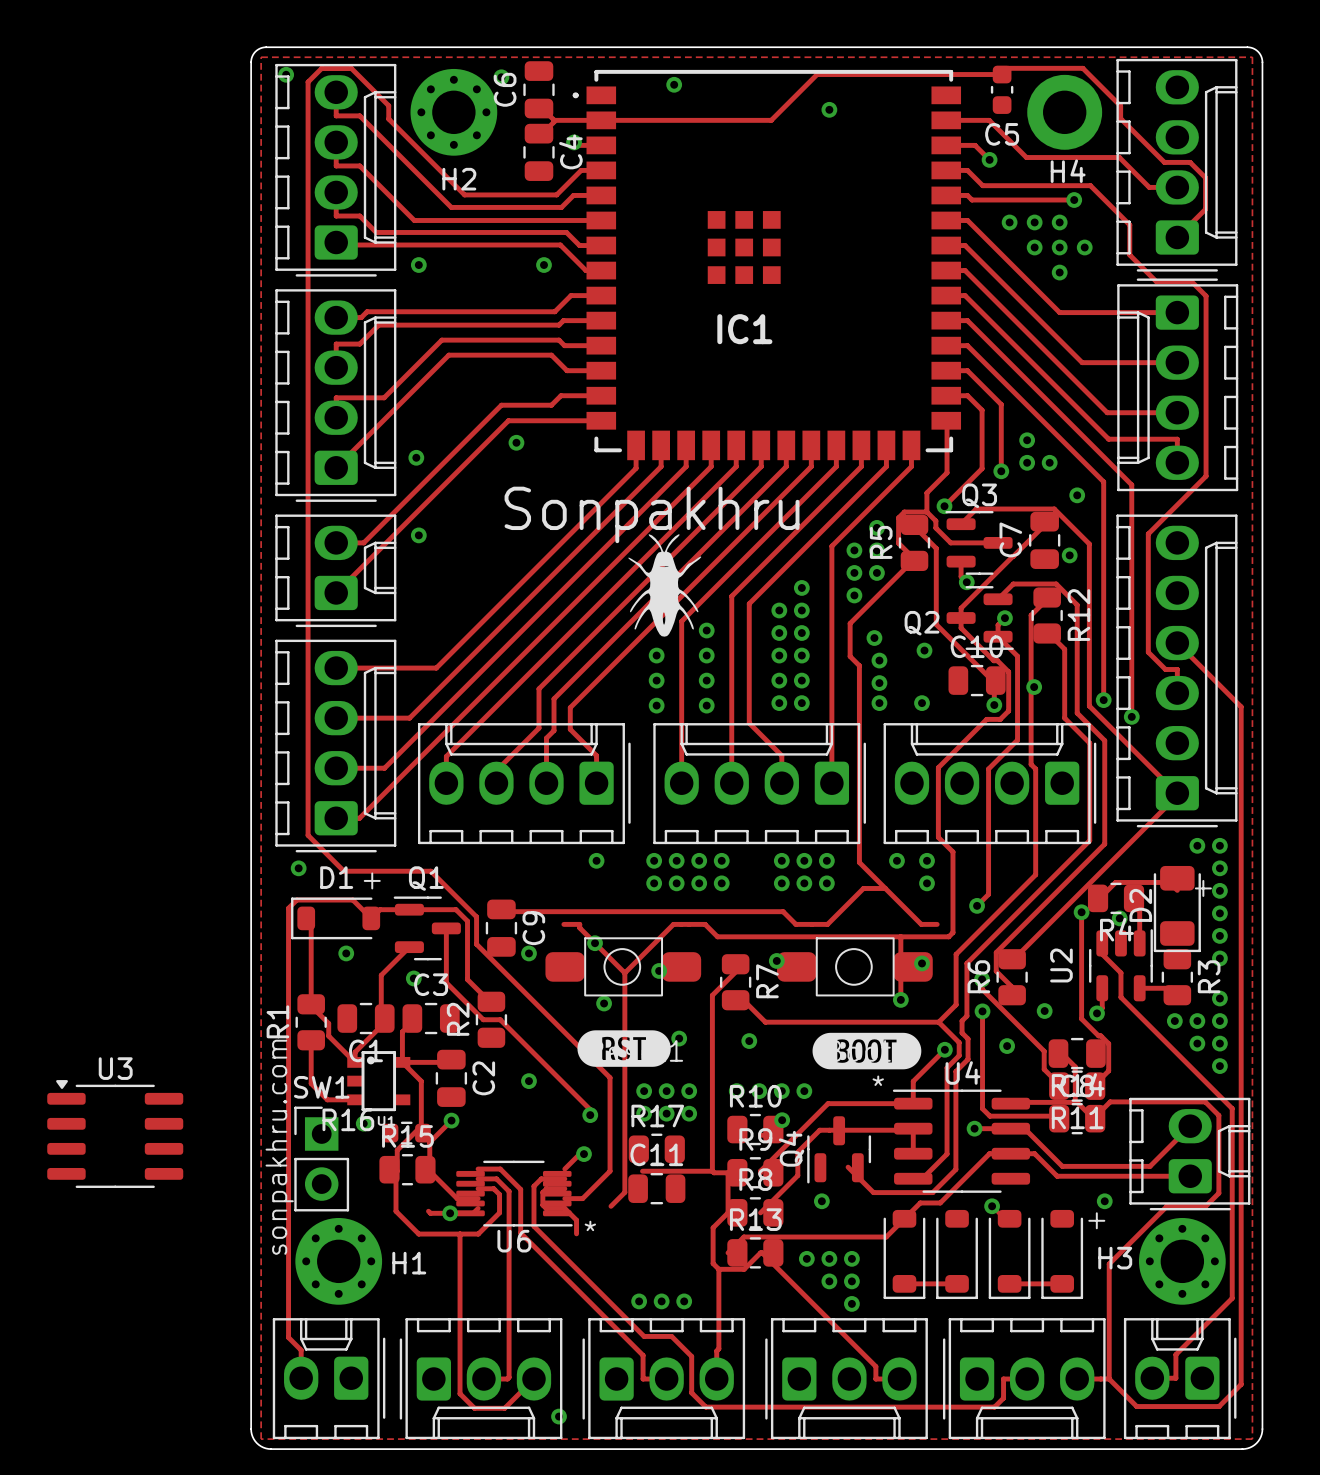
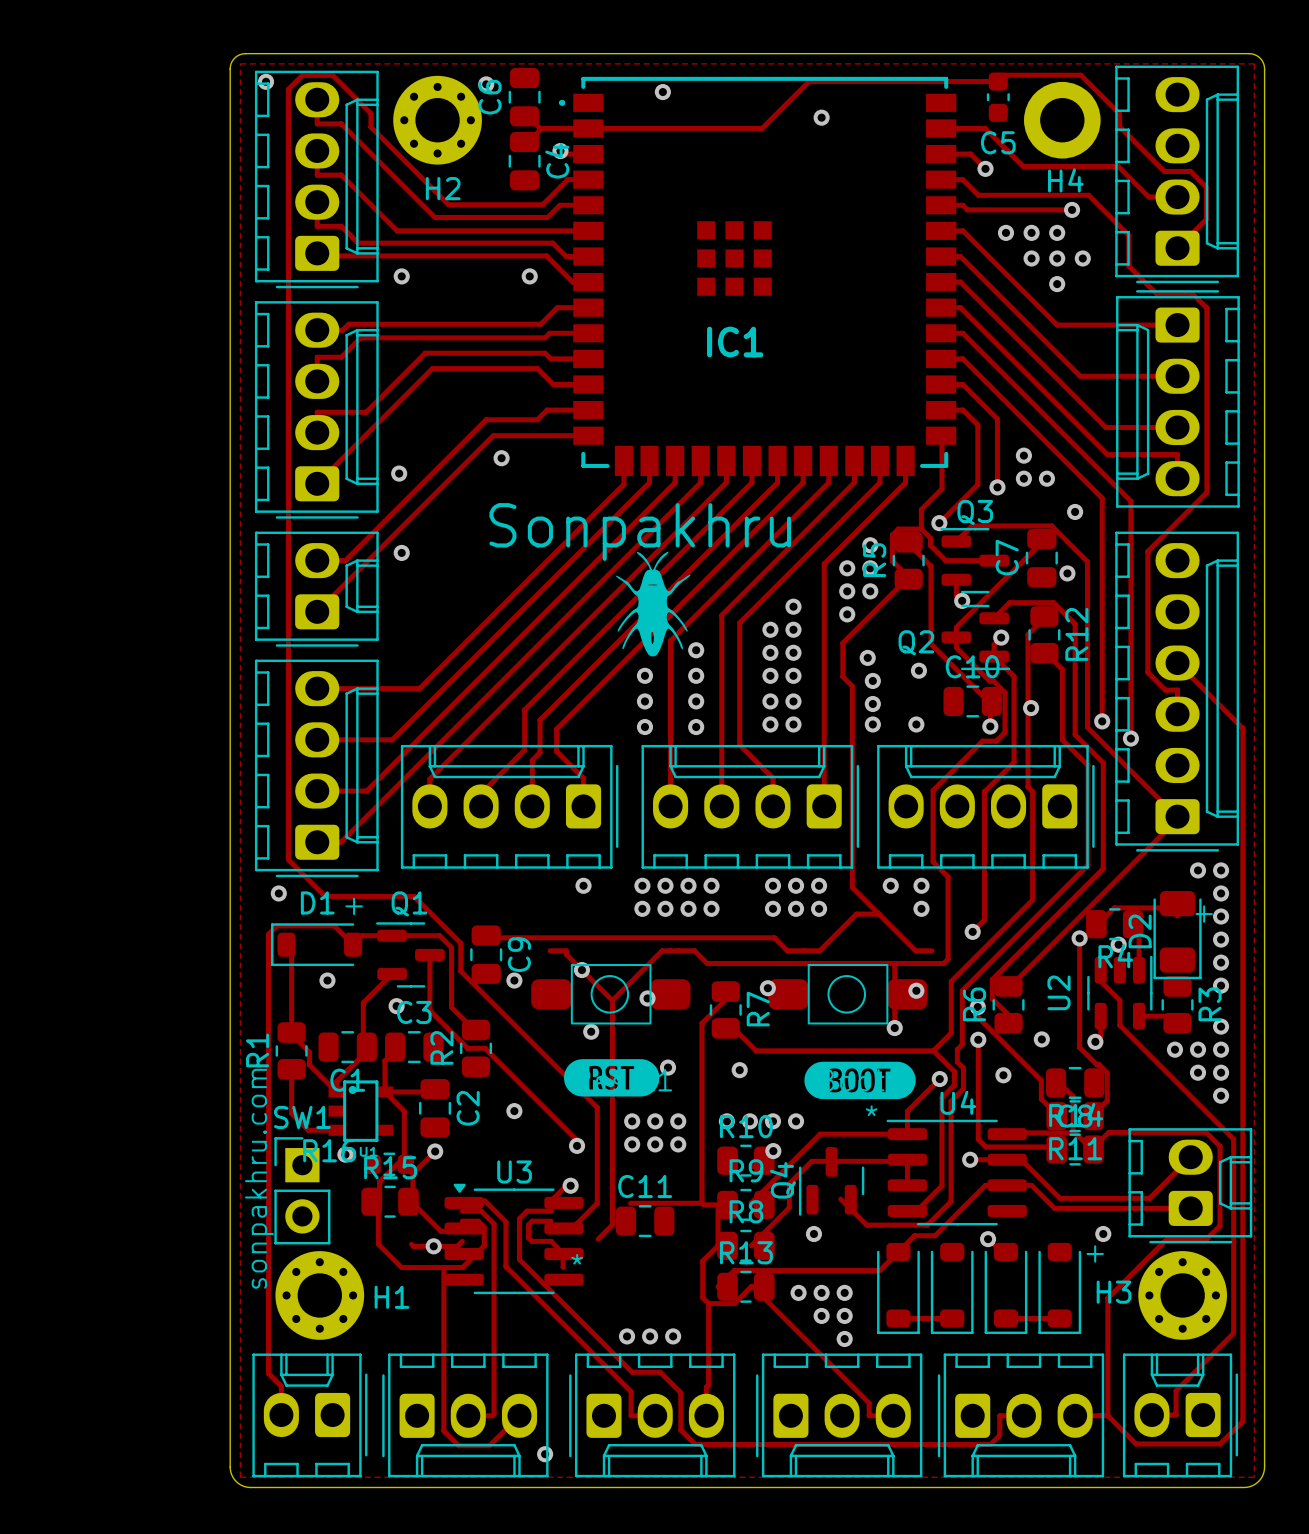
U3 position: (115, 1134) -> (514, 1238)
R17: (656, 1149) -> none
U6: (514, 1193) -> none

